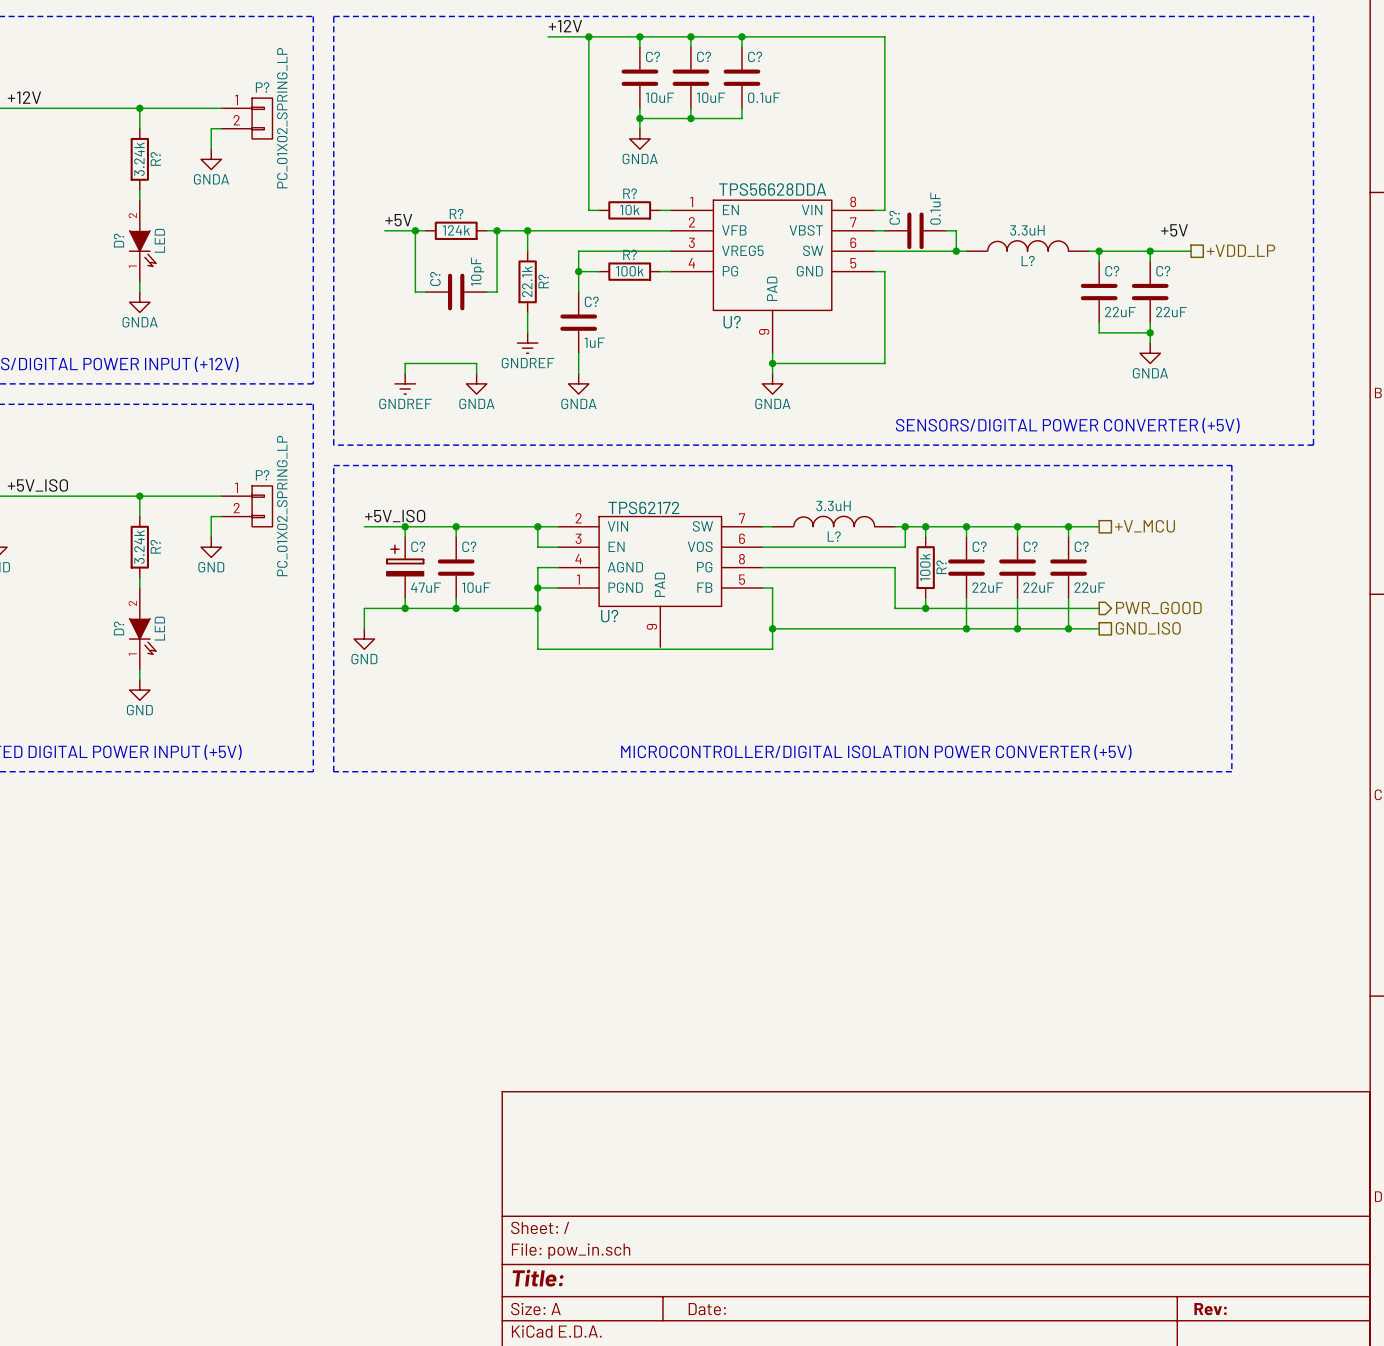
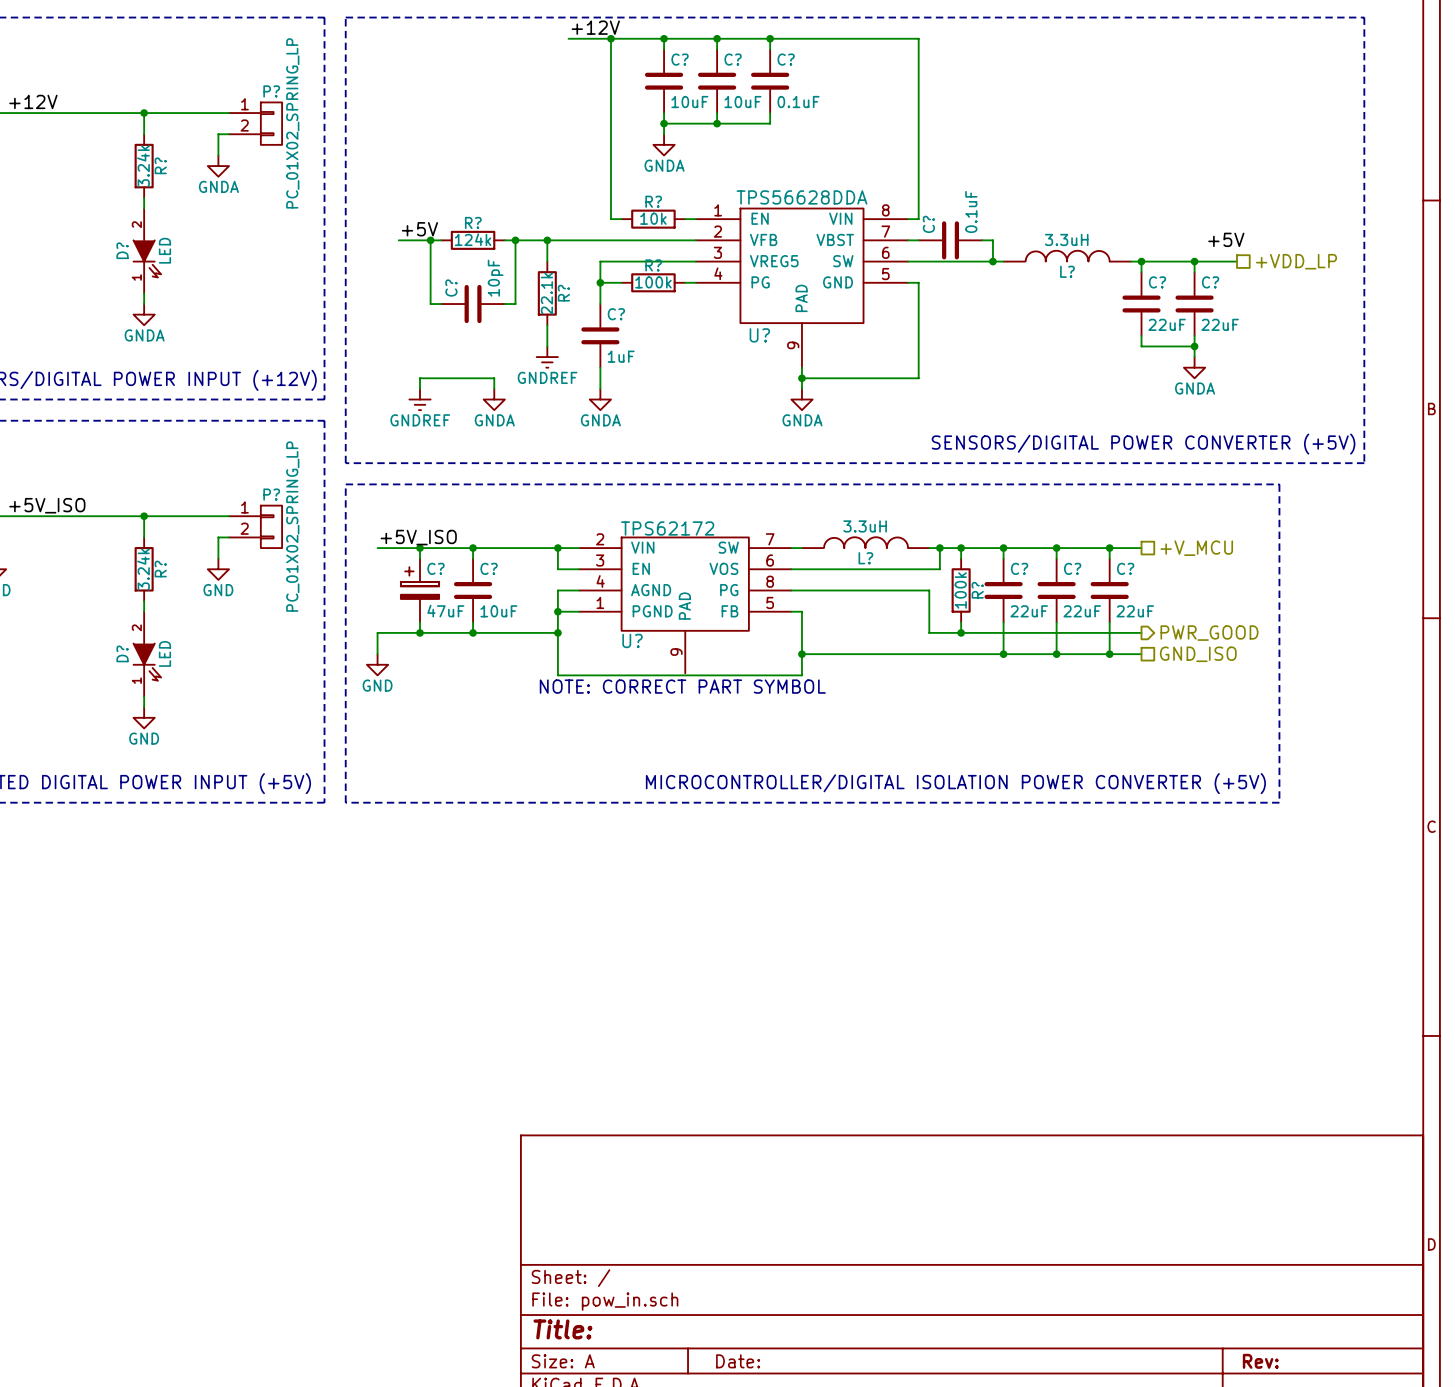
text: none -> NOTE: CORRECT PART SYMBOL (682, 686)

